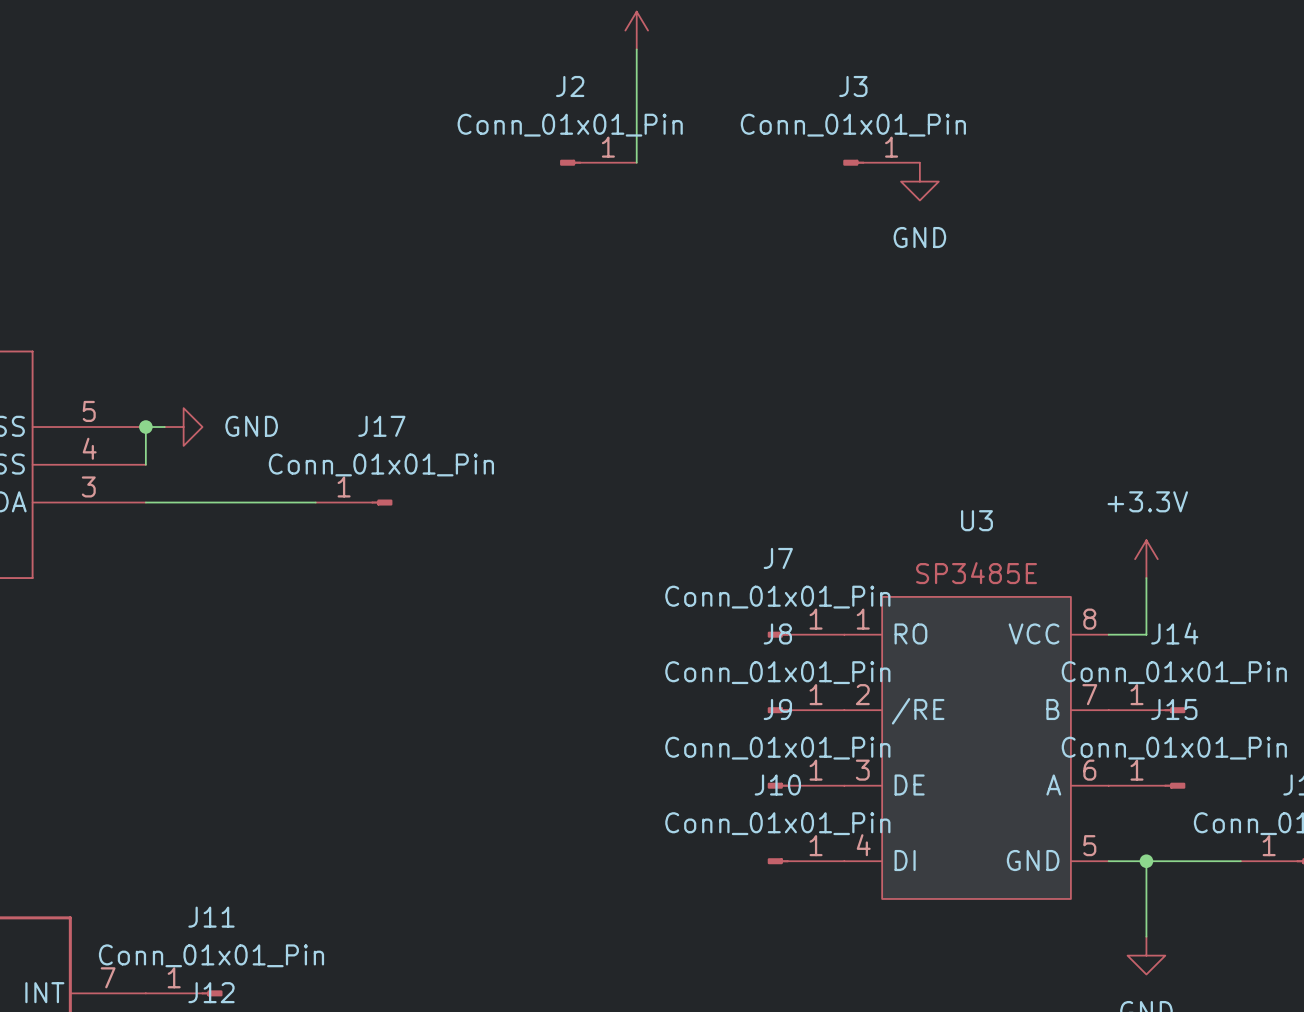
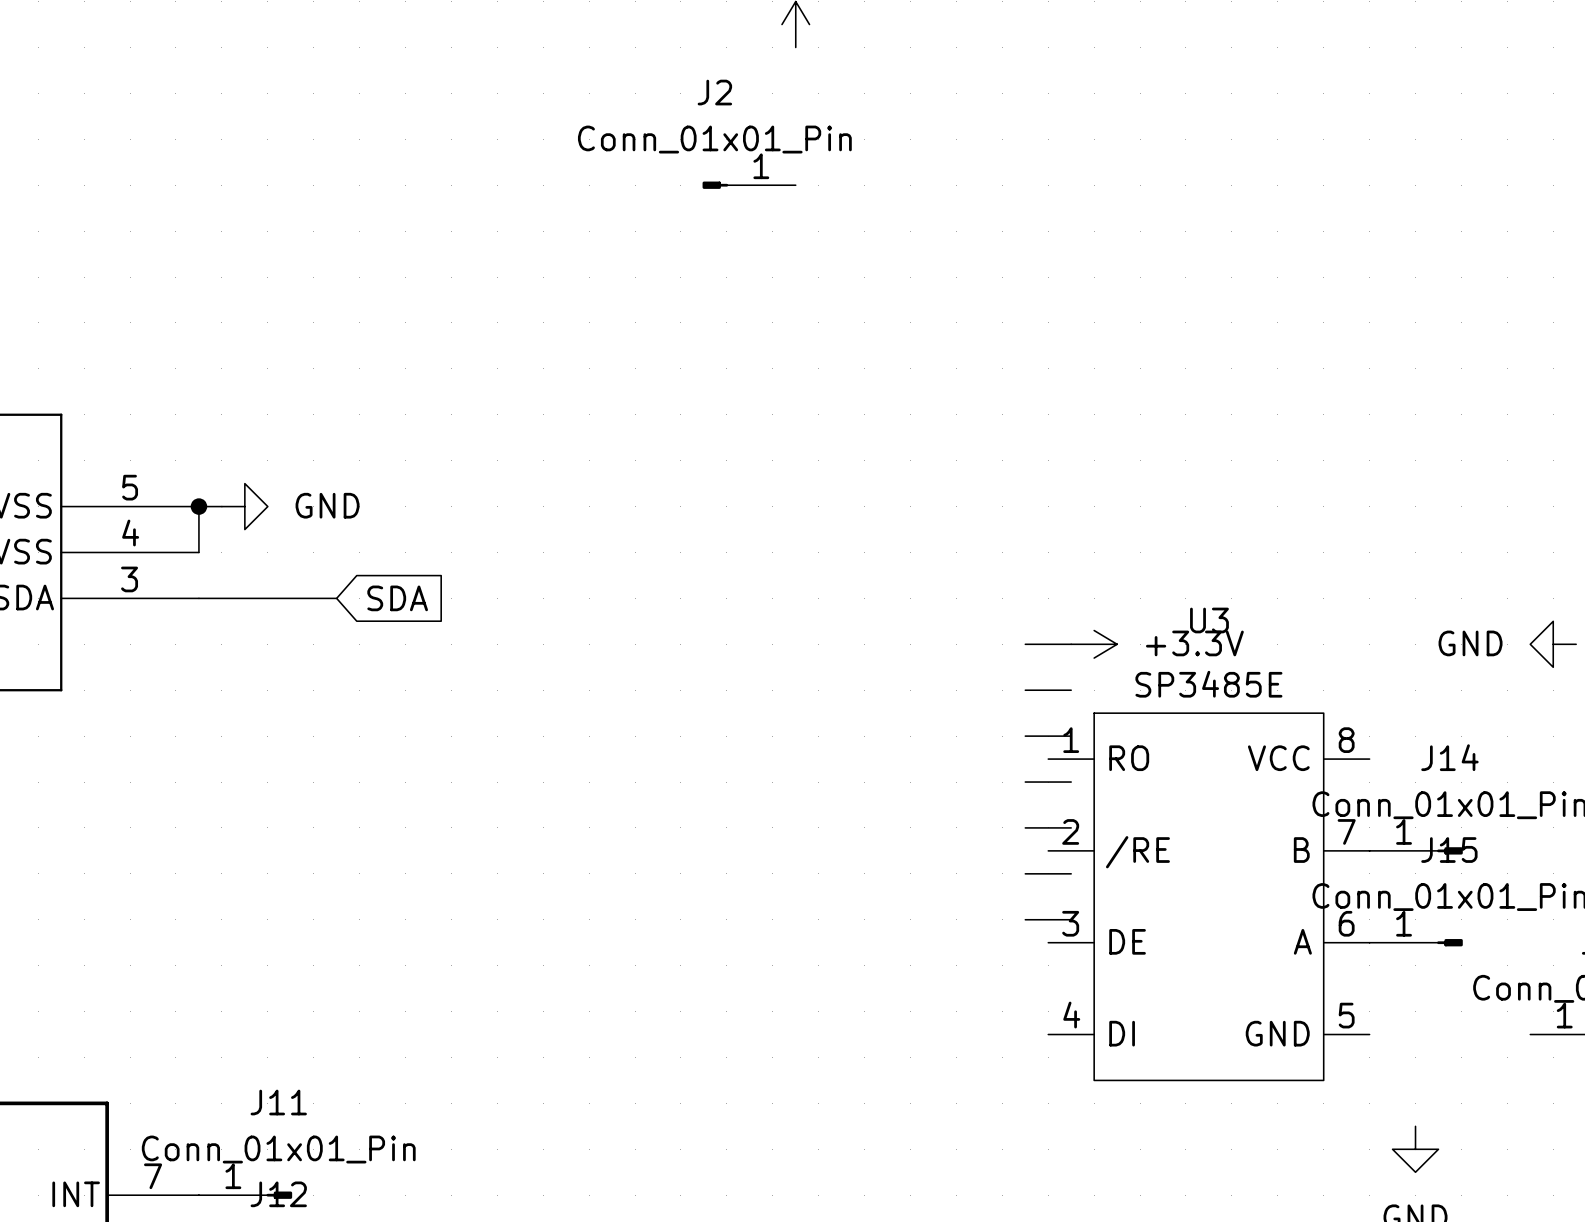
wire: (636, 49) (636, 162) -> none
J3: Conn_01x01_Pin (881, 162) -> none
power symbol: GND (919, 181) -> none
power symbol text position: +3.3V (1147, 501) -> +3.3V (1194, 643)
wire: (259, 502) (315, 502) -> none
global label: none -> SDA (397, 598)
J17: Conn_01x01_Pin (354, 502) -> none
wire: none -> (1025, 644) (1071, 644)
power symbol: none -> GND (1553, 644)
power symbol rotation: 0° (1146, 559) -> 90° clockwise (1094, 644)
power symbol position: +3.3V (1146, 559) -> +3.3V (1094, 644)
wire: none -> (1025, 690) (1071, 690)
wire: (1146, 578) (1146, 634) (1108, 634) -> none
wire: none -> (1025, 736) (1071, 736)
J7: Conn_01x01_Pin (806, 634) -> none
wire: none -> (1025, 782) (1071, 782)
wire: none -> (1025, 827) (1071, 827)
J8: Conn_01x01_Pin (806, 710) -> none
wire: none -> (1025, 873) (1071, 873)
wire: none -> (1025, 919) (1071, 919)
J9: Conn_01x01_Pin (806, 785) -> none
J10: Conn_01x01_Pin (806, 861) -> none
wire: (1108, 861) (1240, 861) -> none
wire: (1146, 861) (1146, 936) -> none
junction: (1146, 861) -> none

